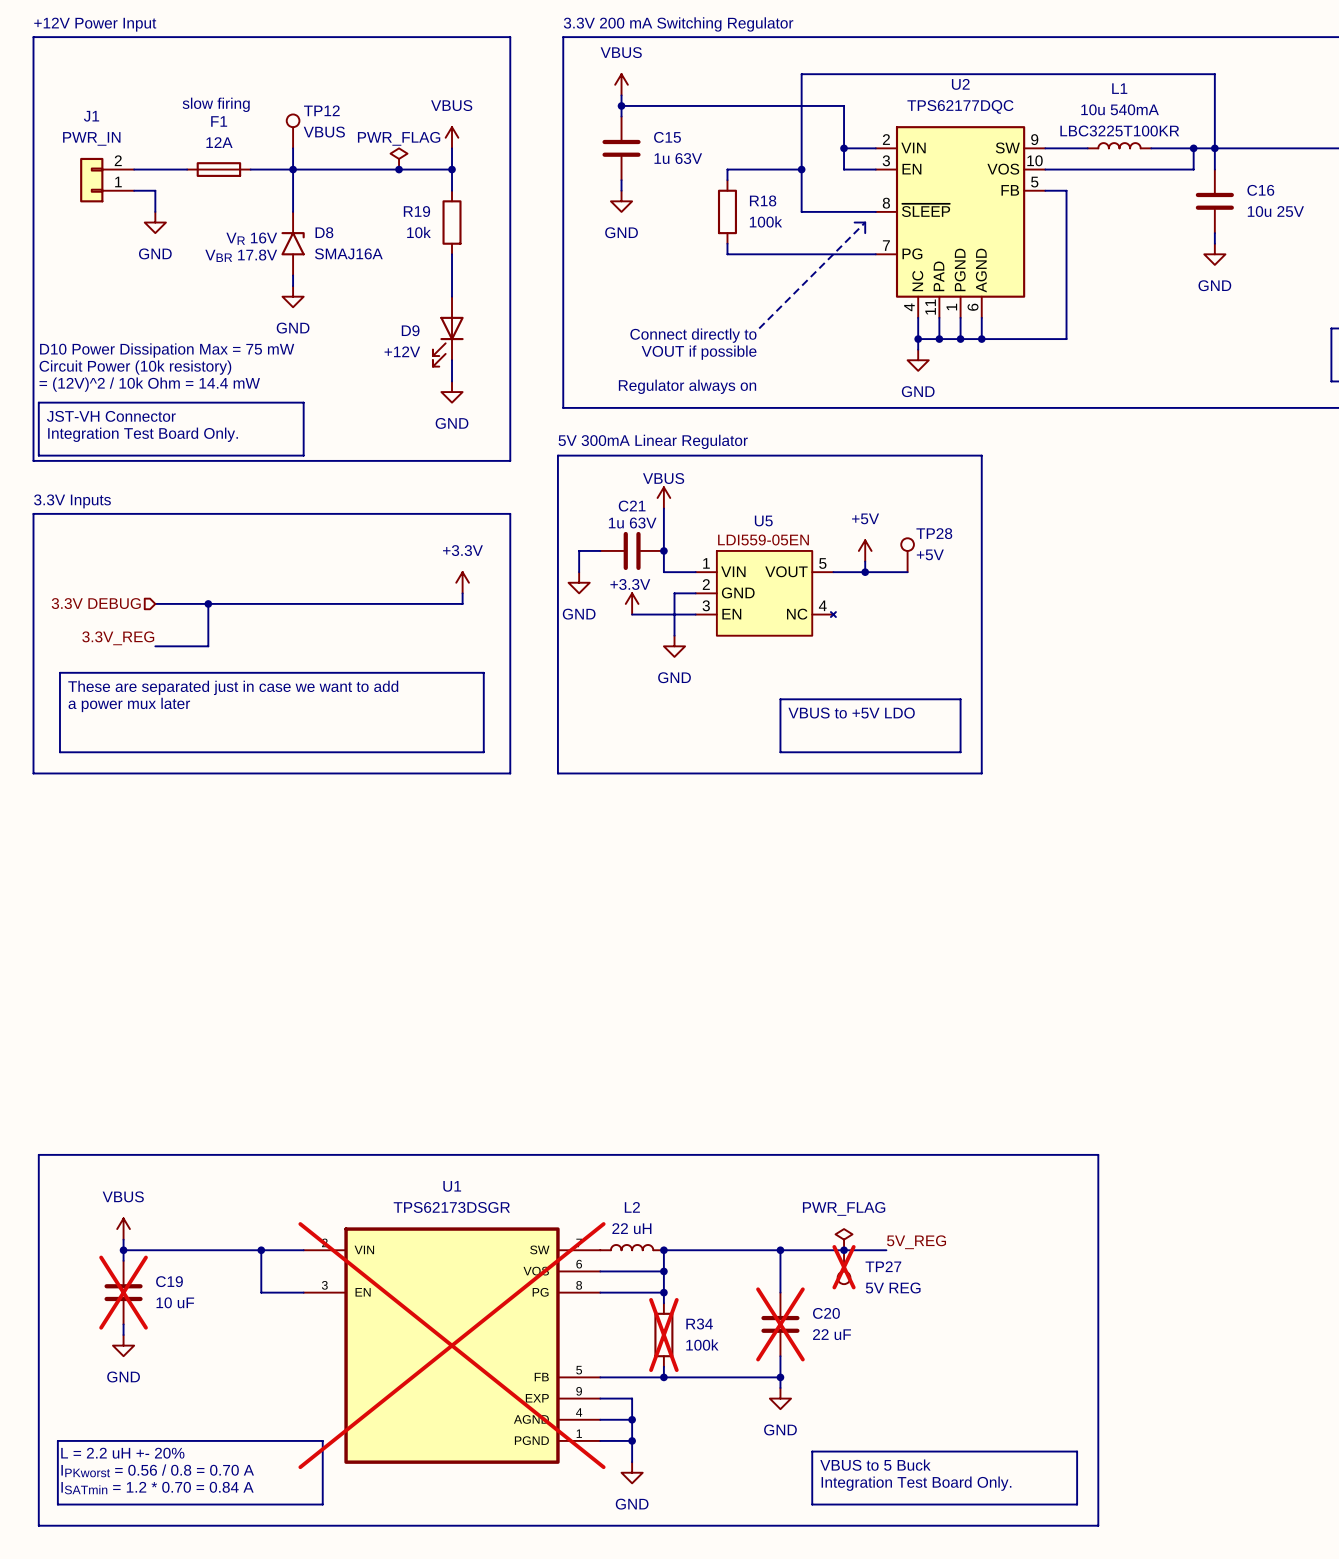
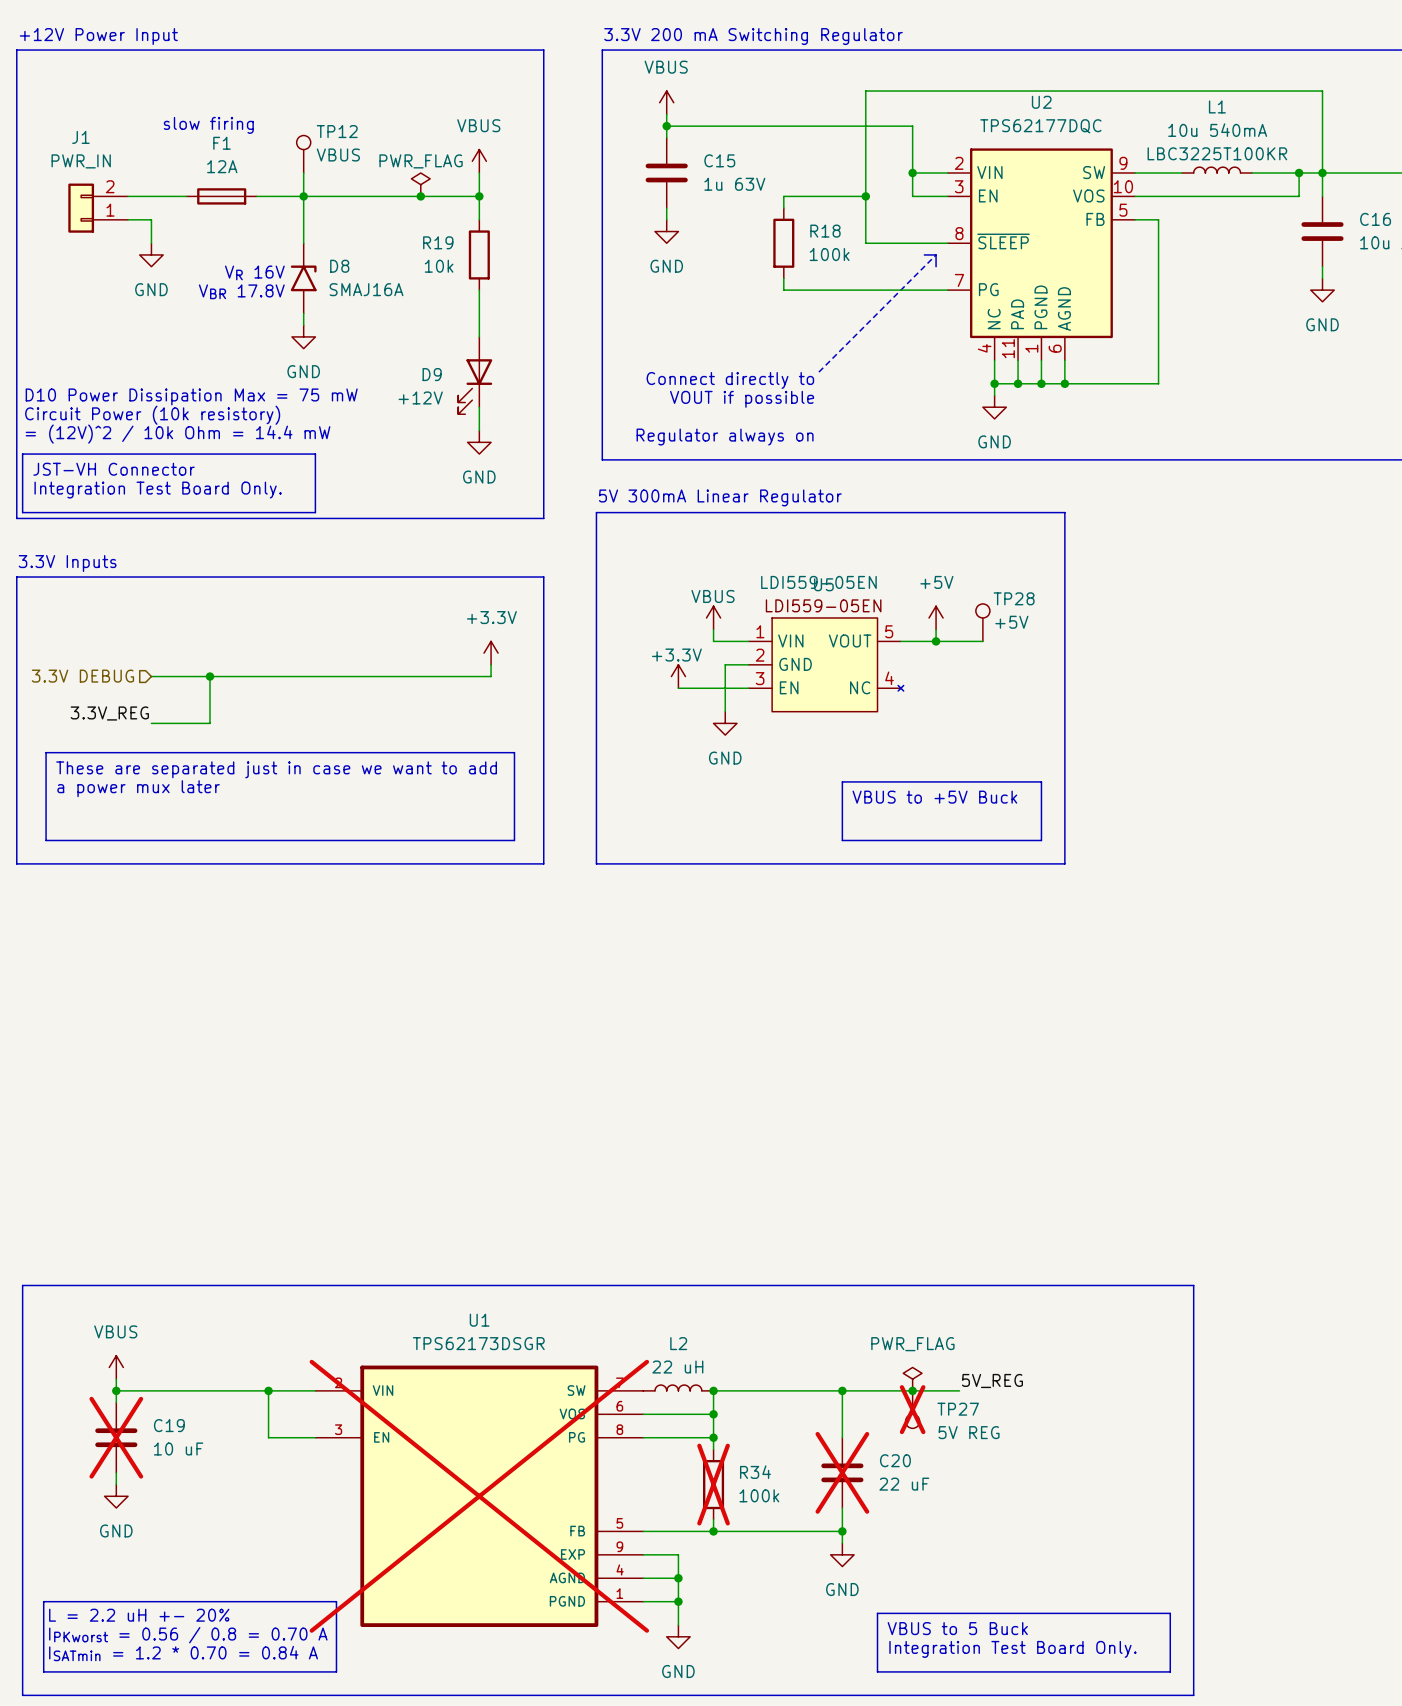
power symbol position: VBUS (663, 497) -> VBUS (713, 617)
wire: (663, 508) (663, 561) -> none
U5 value: none -> LDI559-05EN (818, 582)
wire: (600, 550) (579, 550) (579, 572) -> none
C21: 1u 63V (632, 550) -> none
junction: (663, 550) -> none
power symbol: GND (579, 582) -> none
text: VBUS to +5V LDO (851, 713) -> VBUS to +5V Buck (934, 797)

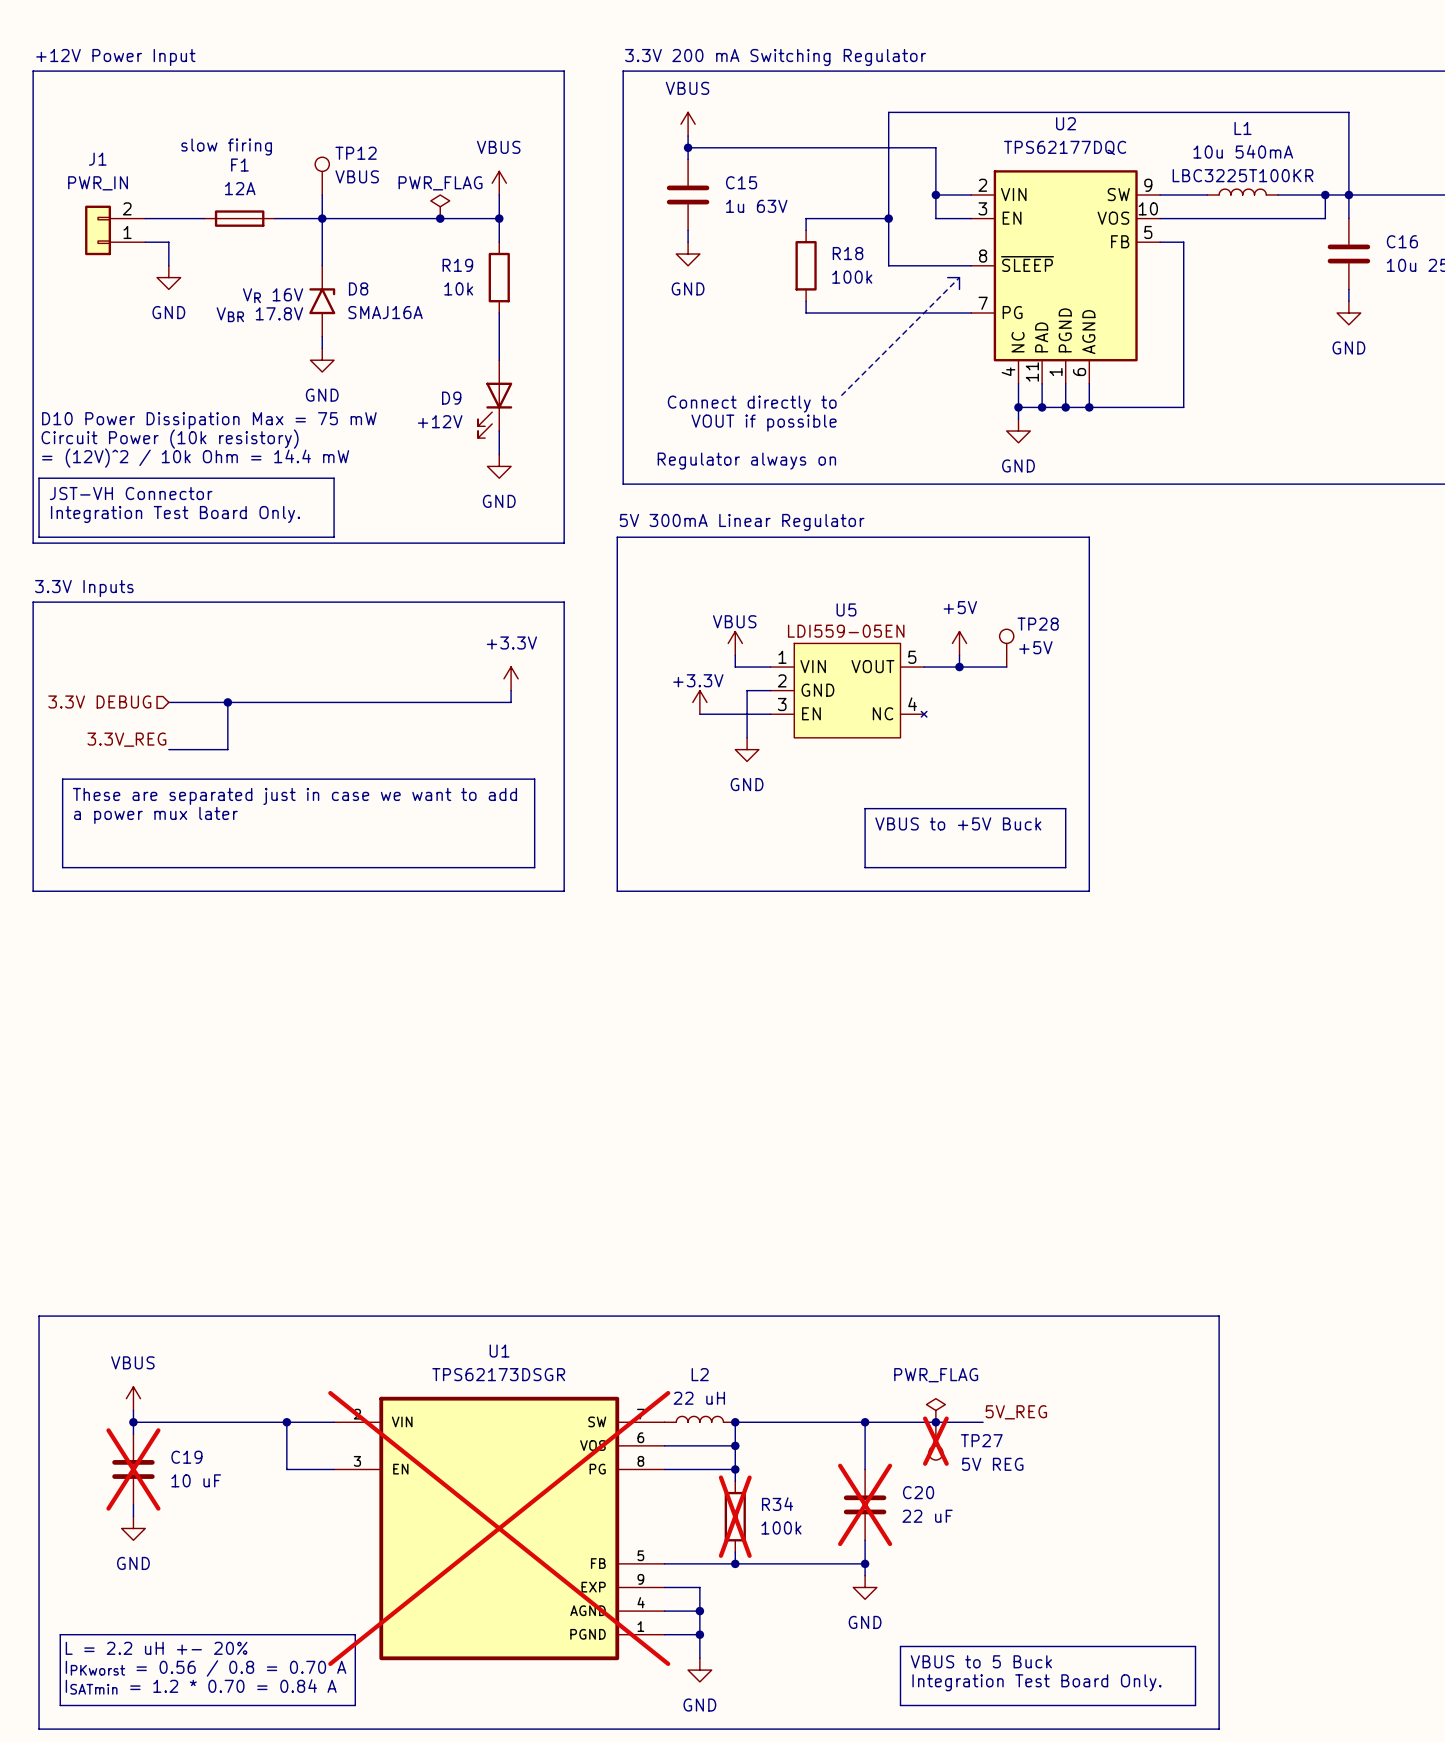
U5 value: LDI559-05EN (818, 582) -> none

